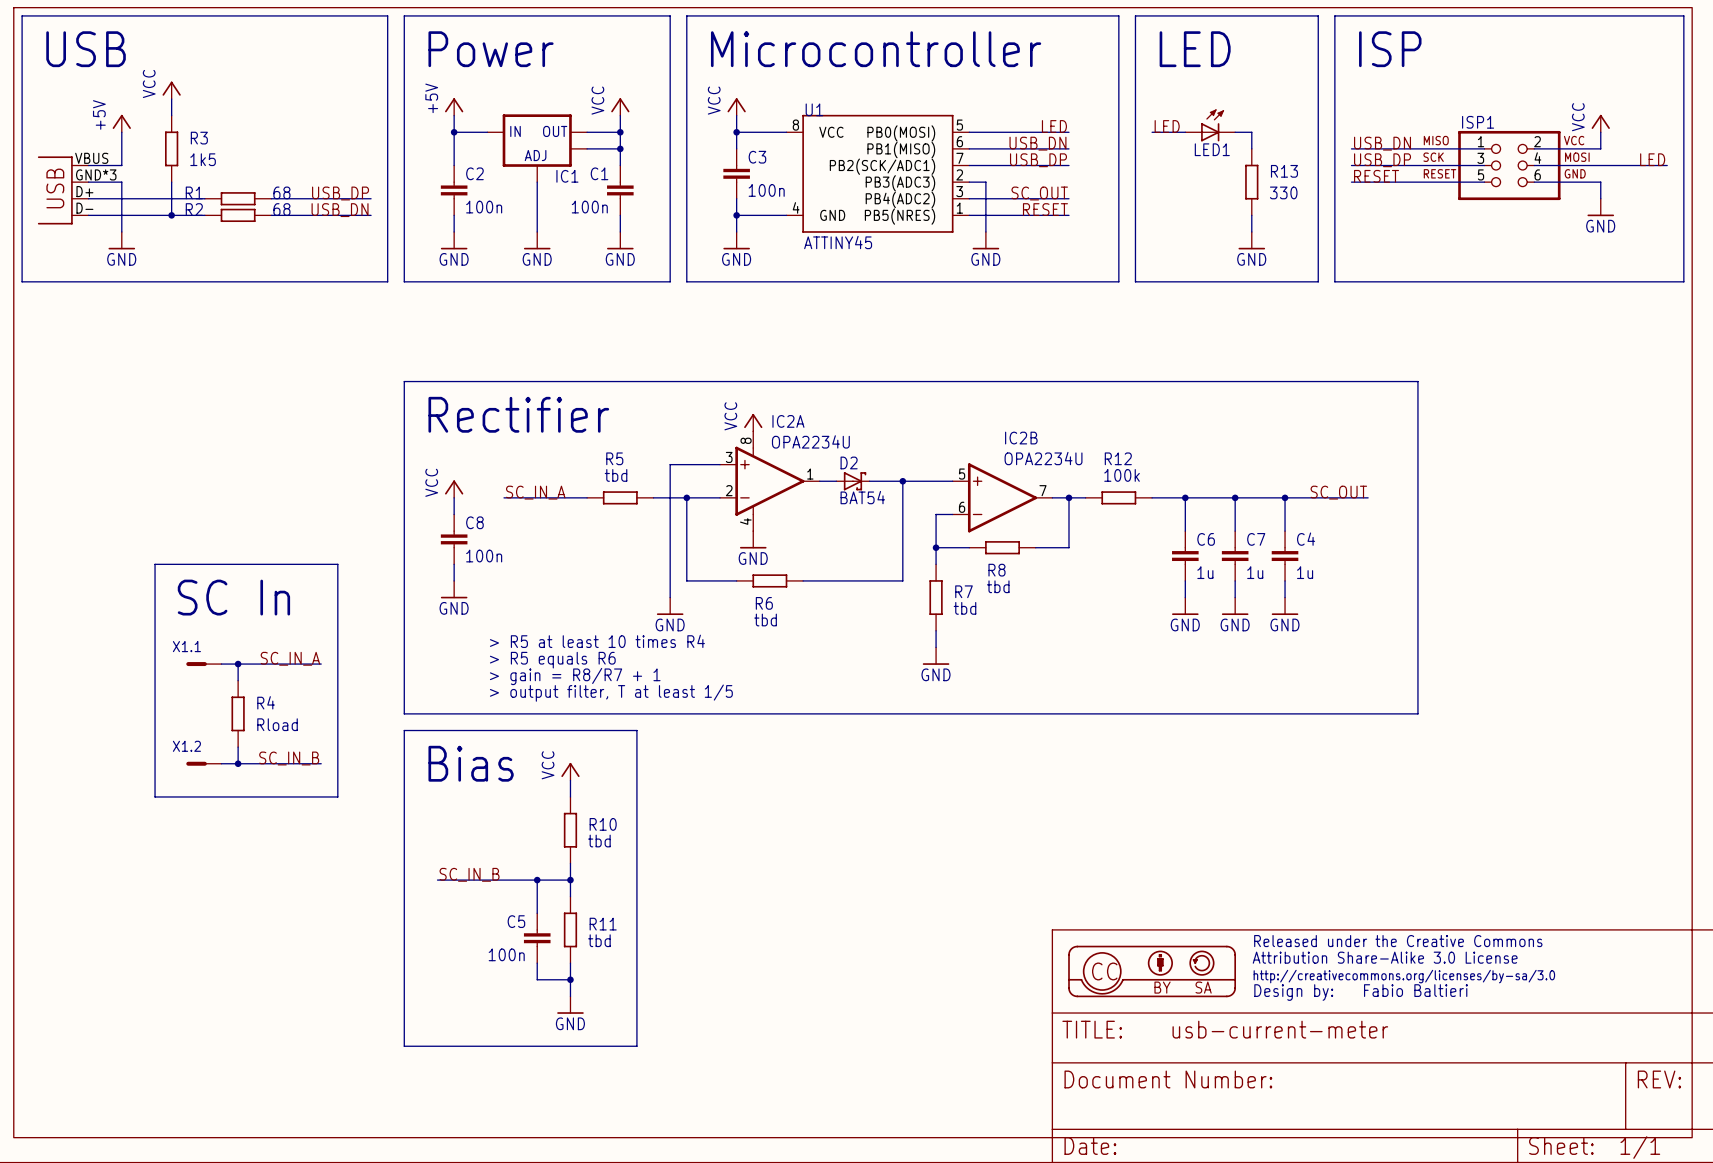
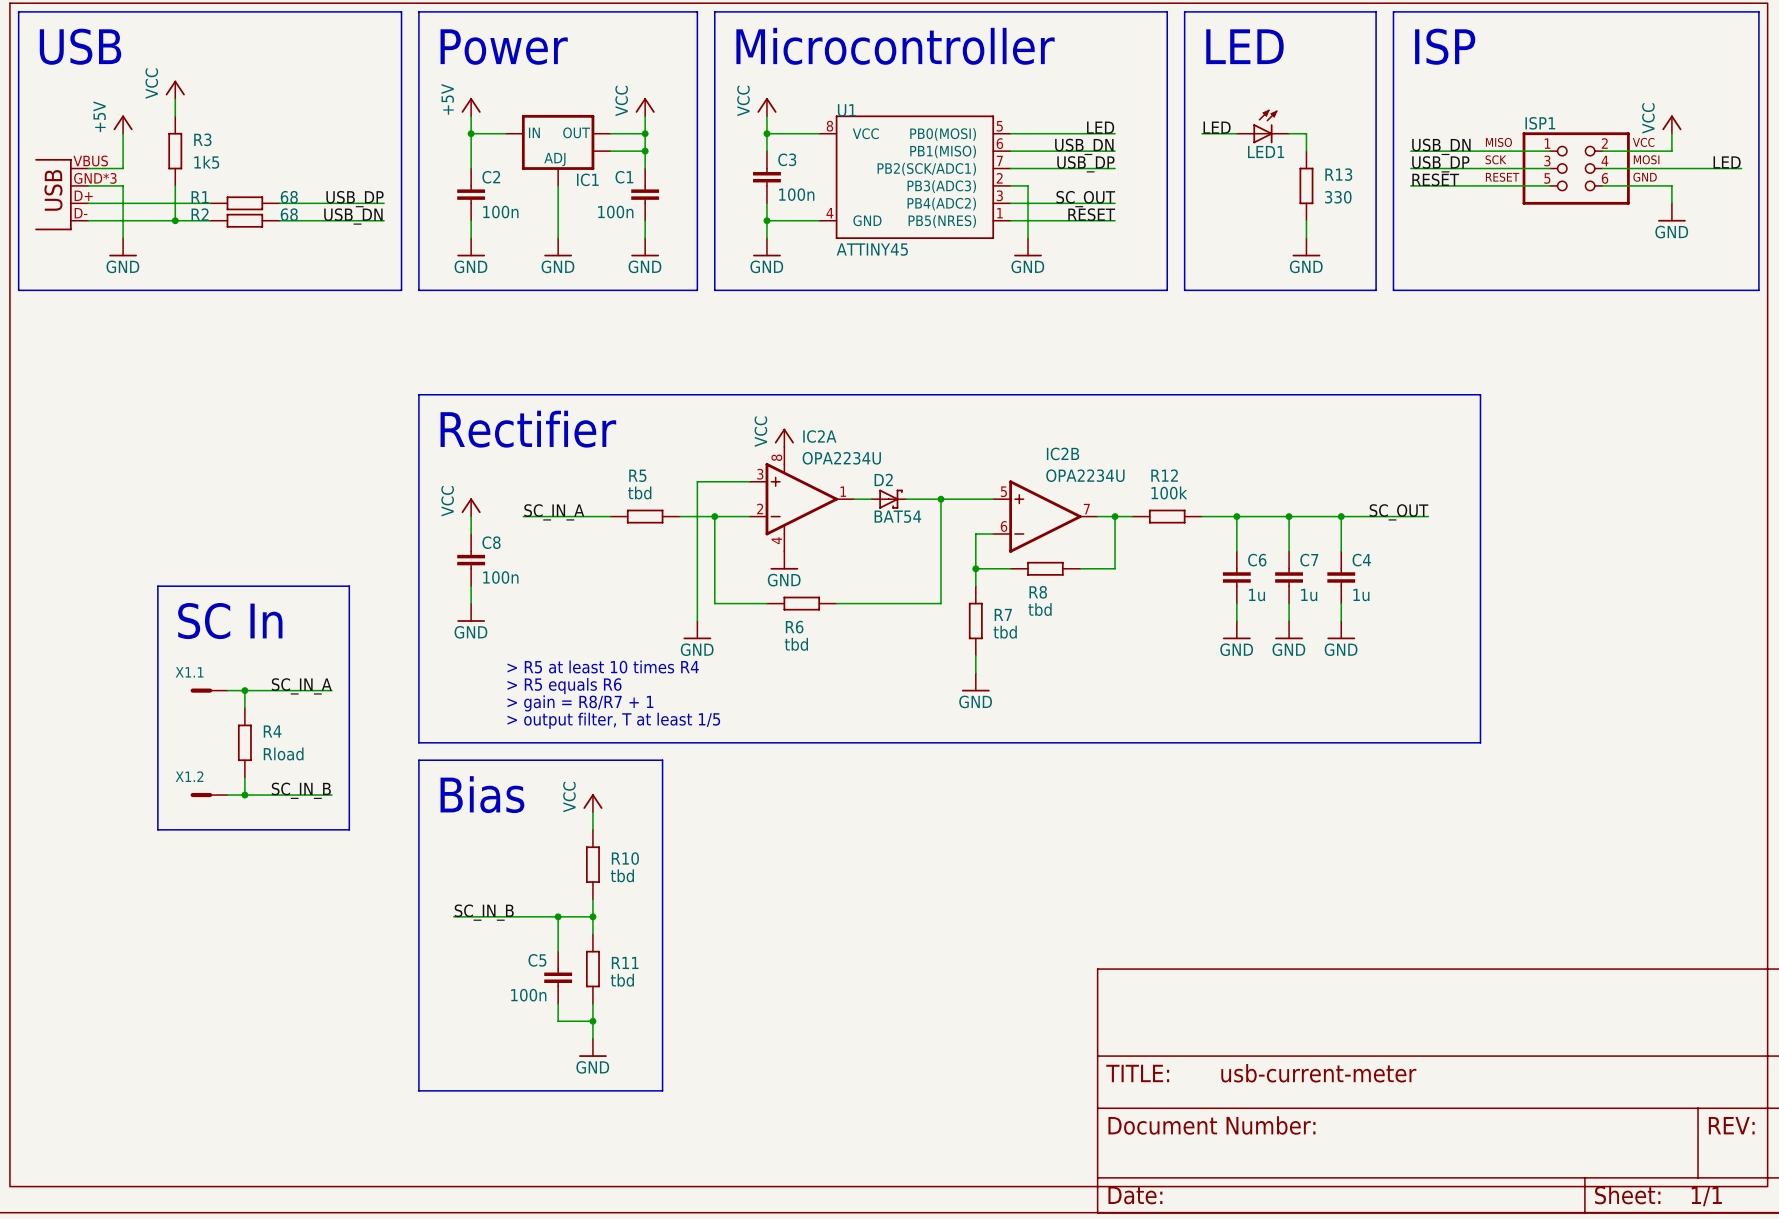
part: Fabio Baltieri (1403, 967) -> none
part: (1152, 971) -> none

